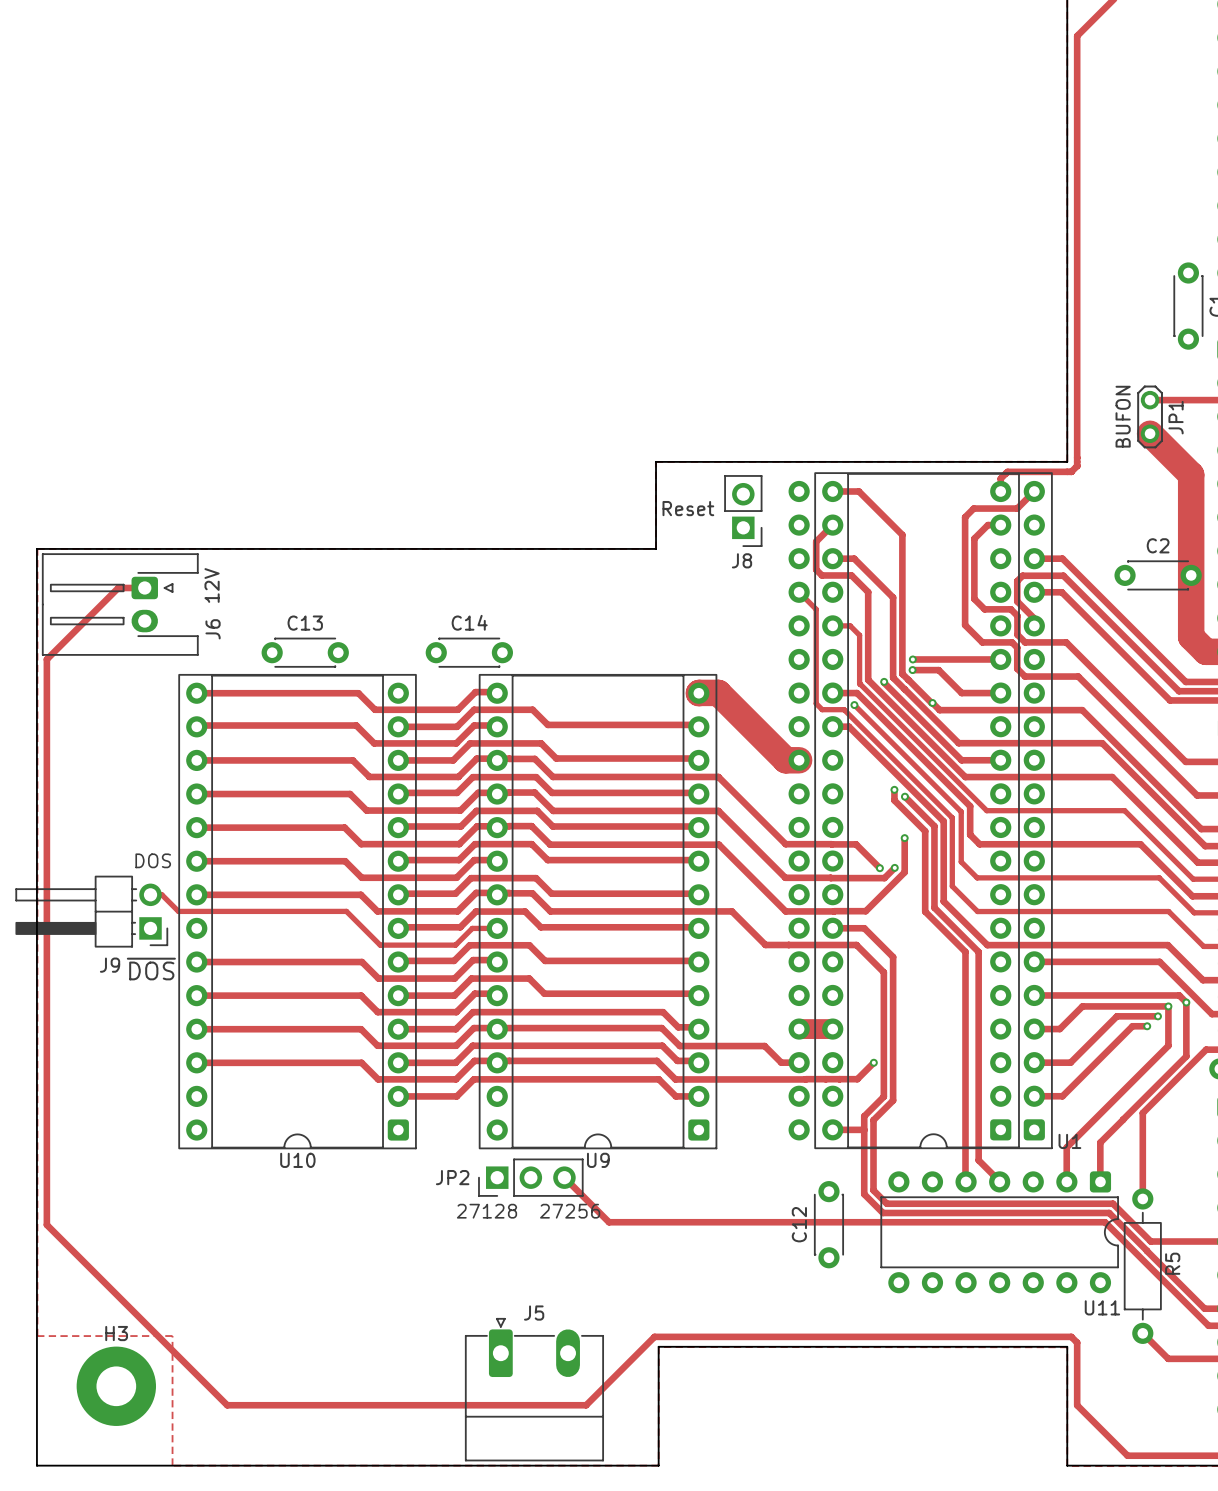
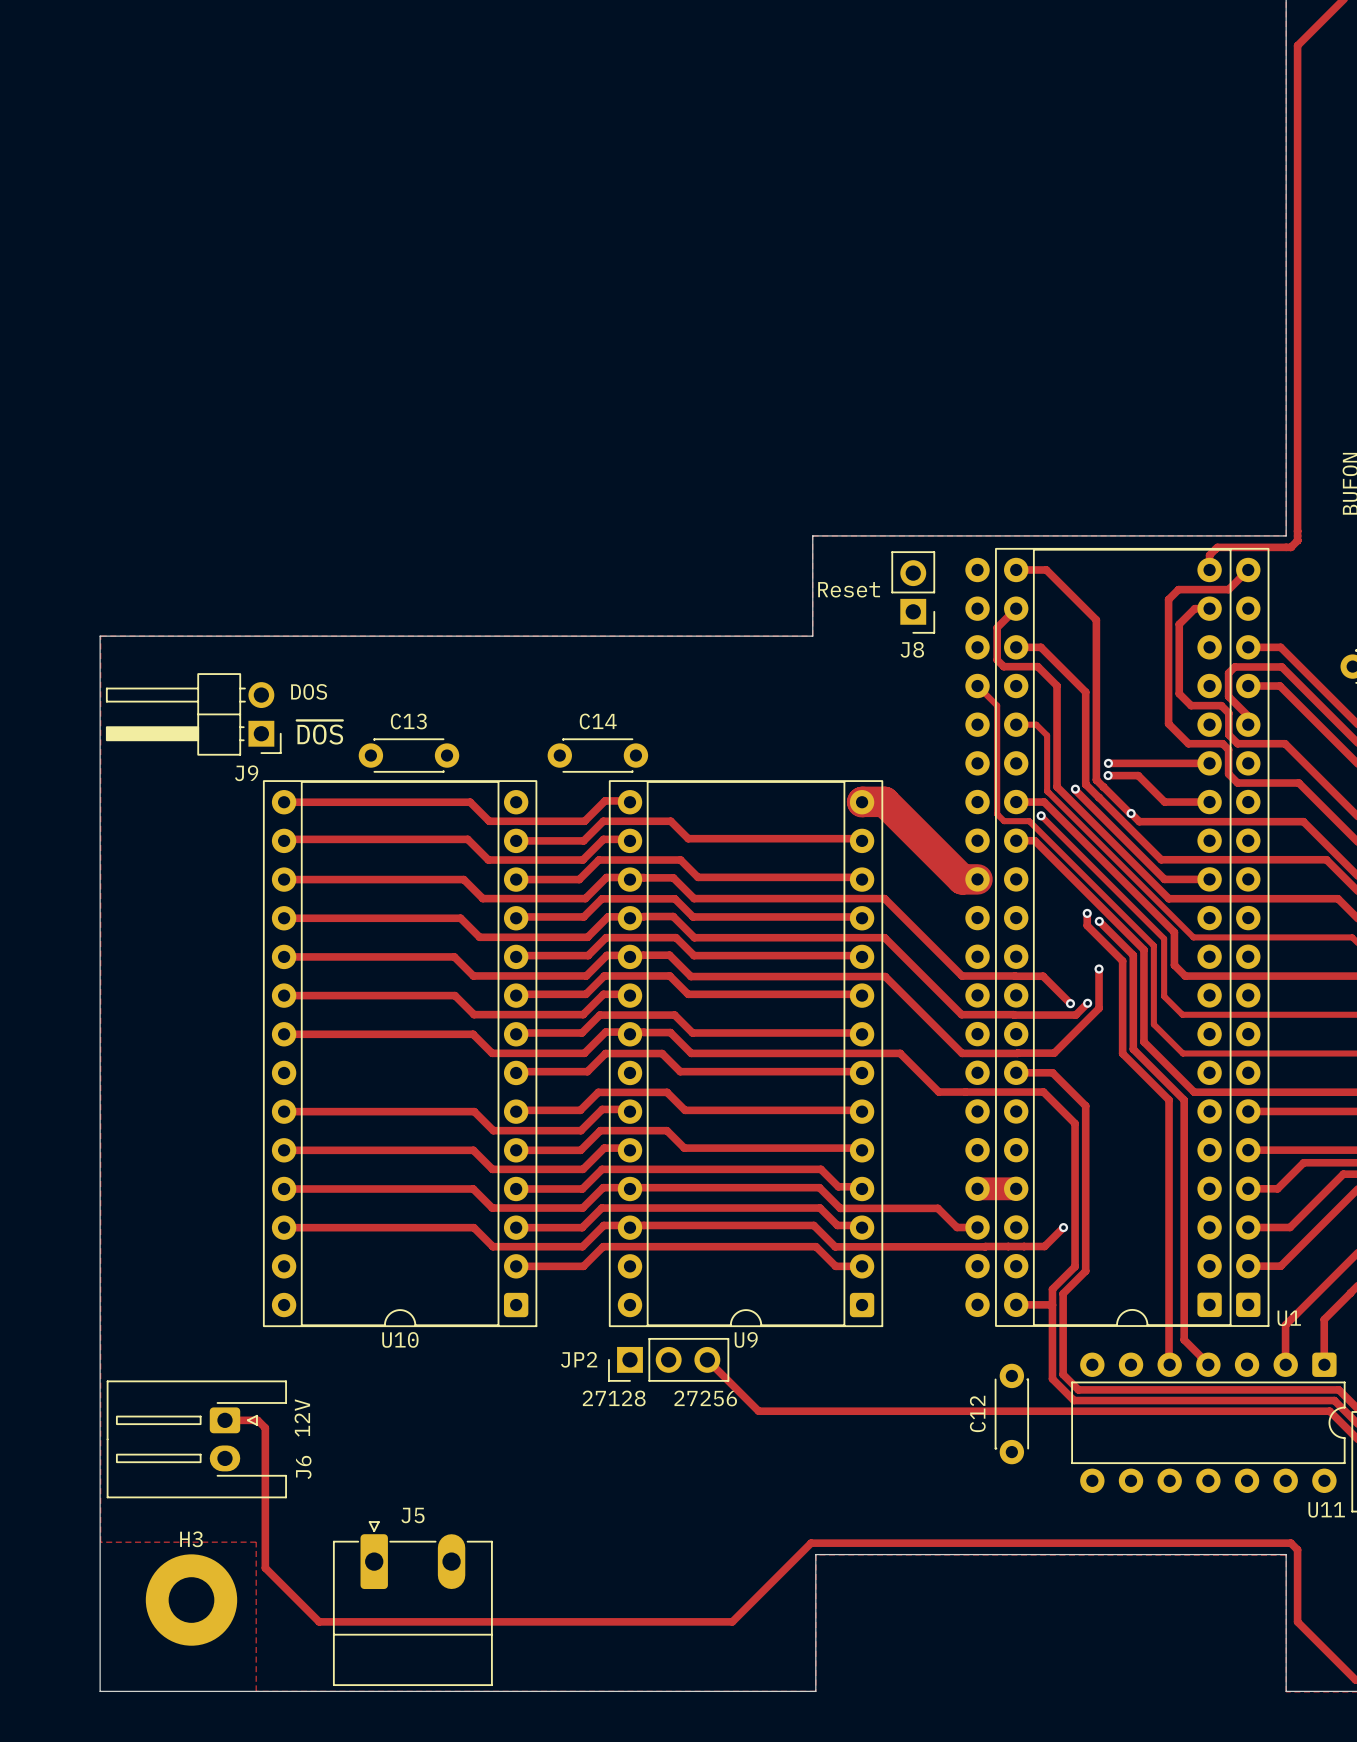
track: (144, 587) (118, 587) (46, 659) (46, 1224) (180, 1358) -> (224, 1420) (257, 1420) (265, 1427) (265, 1568)
J6 position: (120, 604) -> (196, 1439)
text: none -> ~{DOS} (319, 732)
text position: DOS (153, 860) -> DOS (309, 691)
track: (150, 894) (161, 894) (178, 911) (346, 911) (380, 945) (455, 945) (472, 928) (497, 928) -> none
J9 position: (91, 911) -> (193, 714)
J9 name position: J9 (110, 965) -> J9 (246, 773)
text: ~{DOS} (151, 969) -> none
J5 position: (534, 1389) -> (412, 1603)

